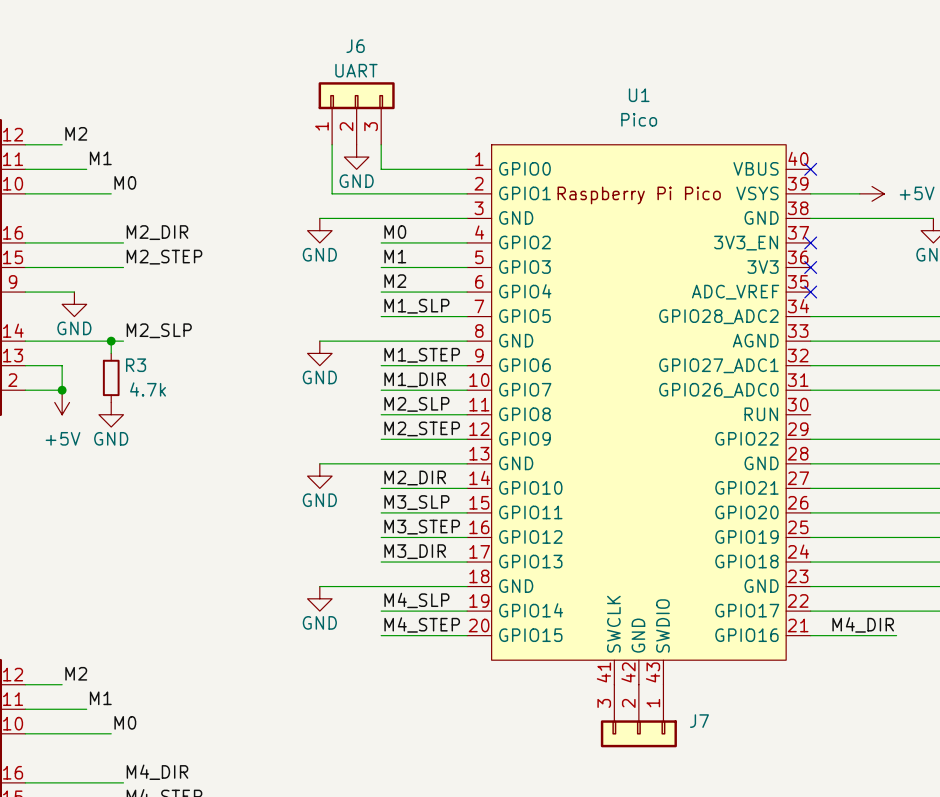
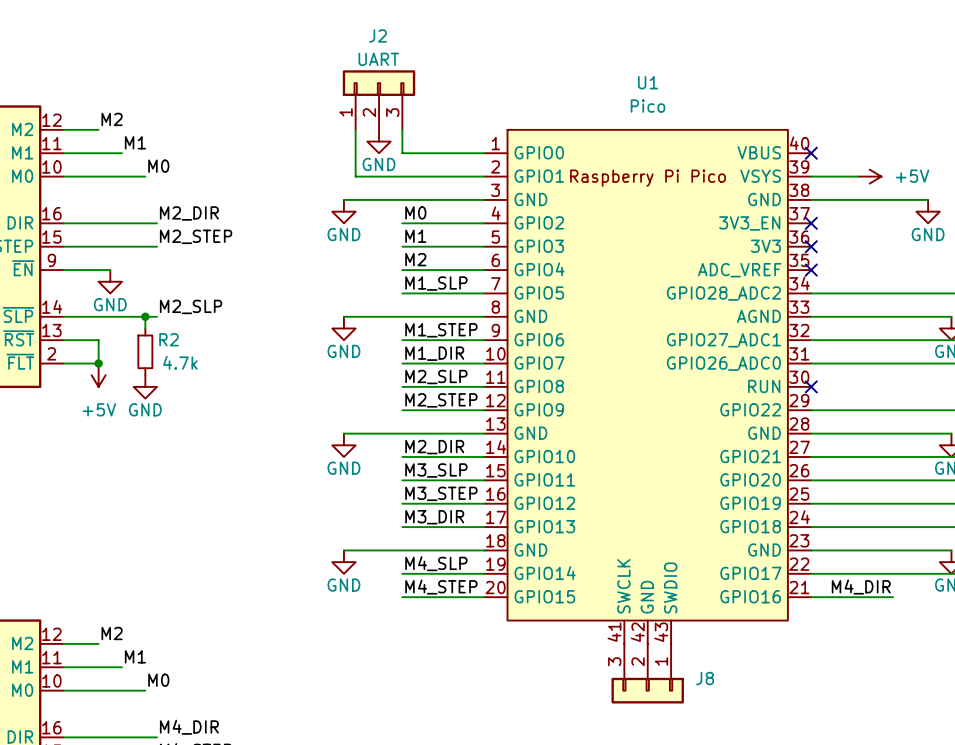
J6 name: J6 (355, 46) -> J2 (377, 35)
R3 name: R3 (136, 365) -> R2 (168, 339)
no-connect mark: none -> (811, 386)
J7 name: J7 (699, 721) -> J8 (705, 678)

